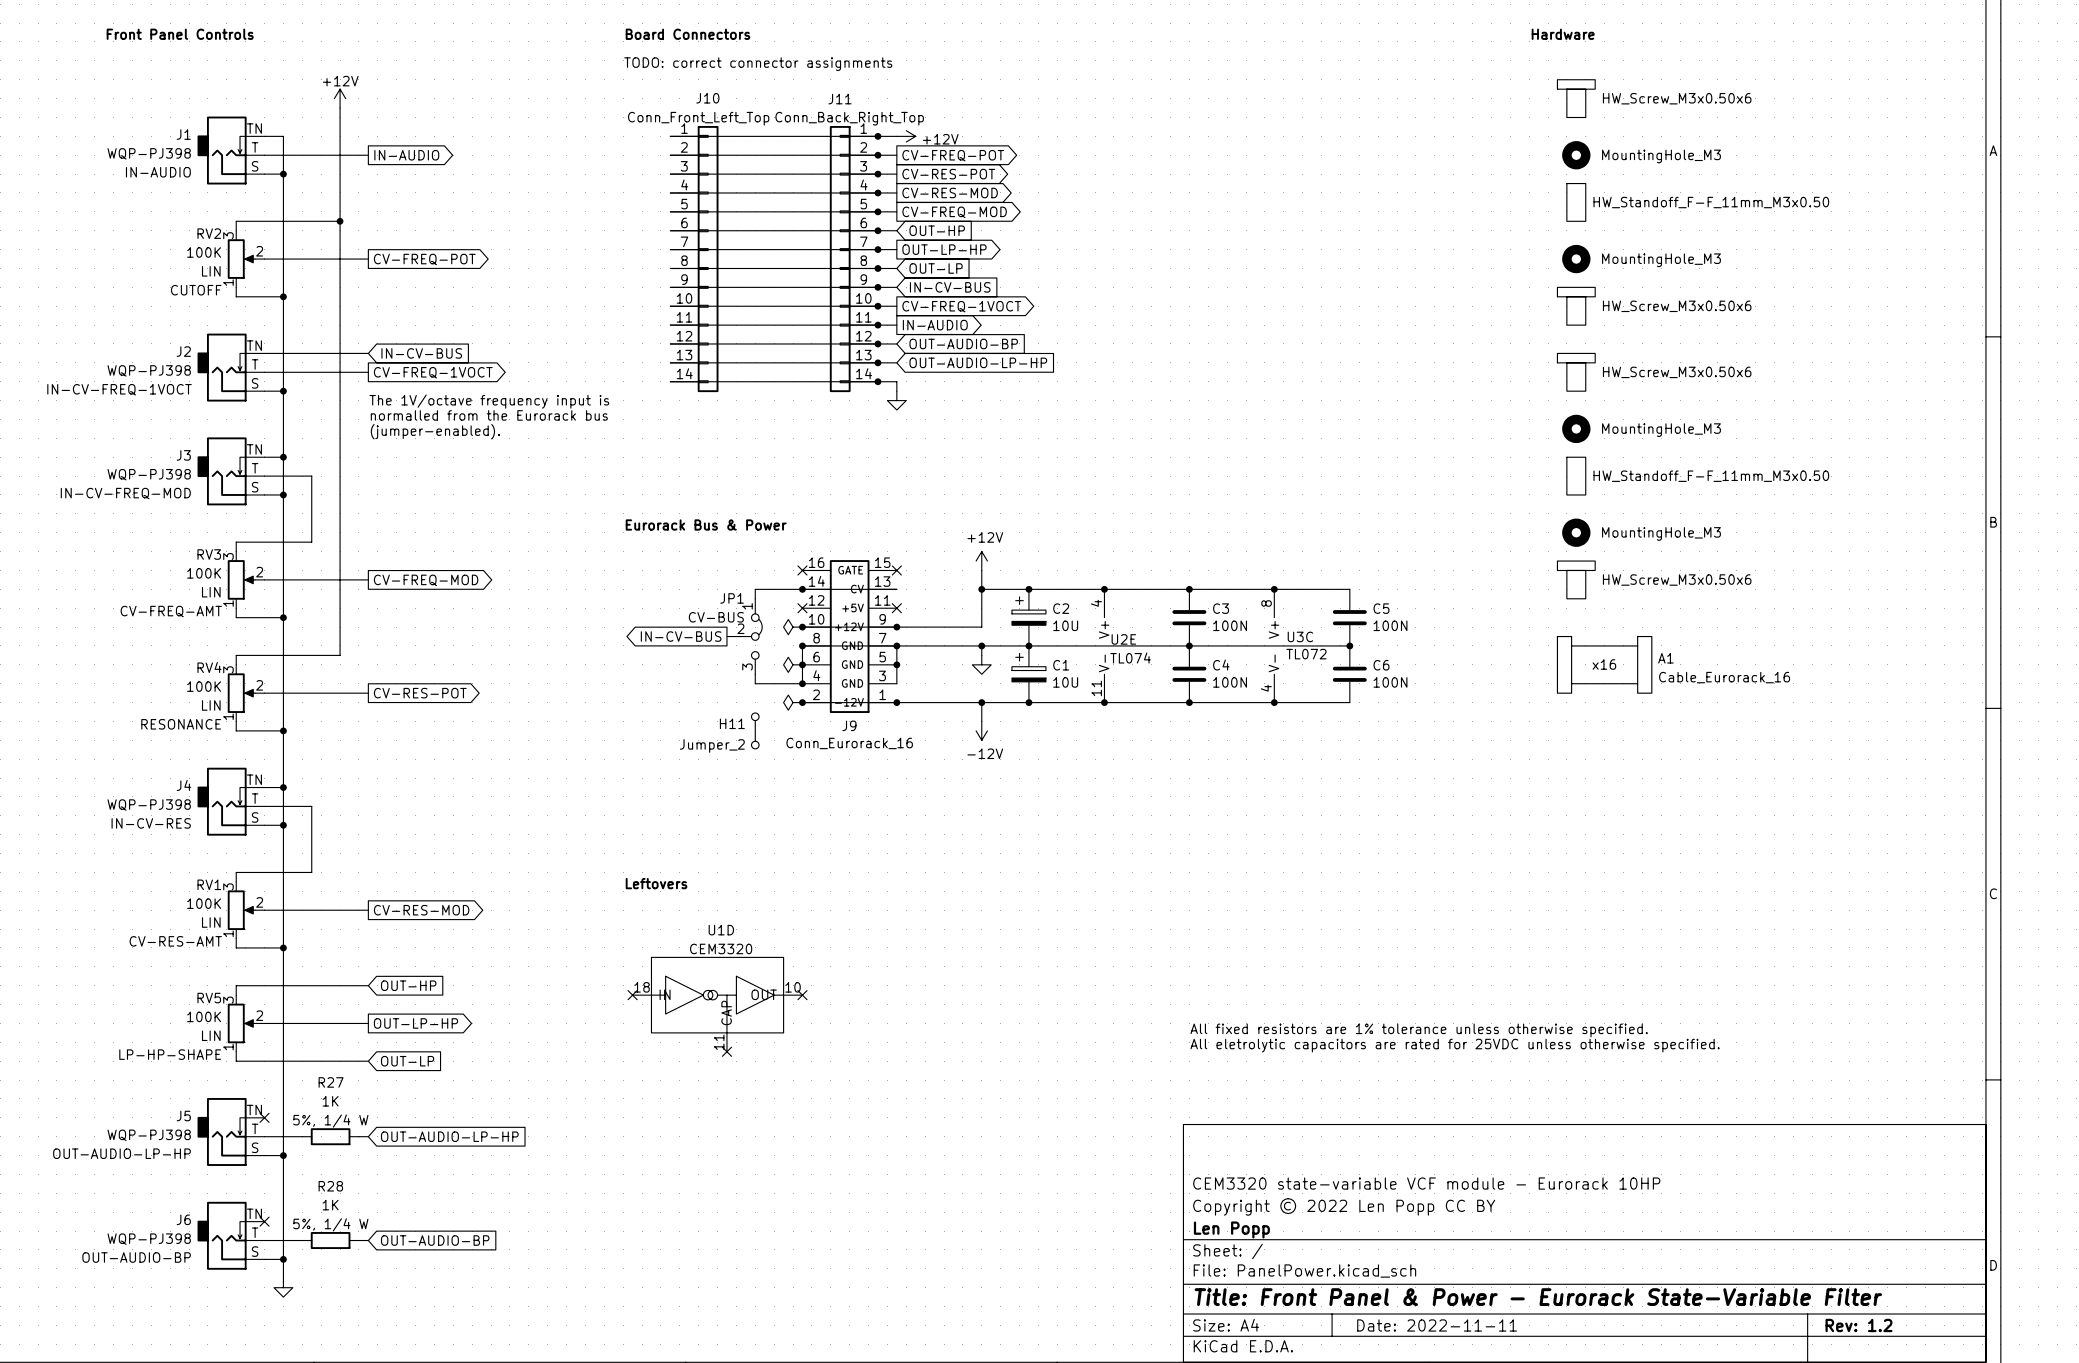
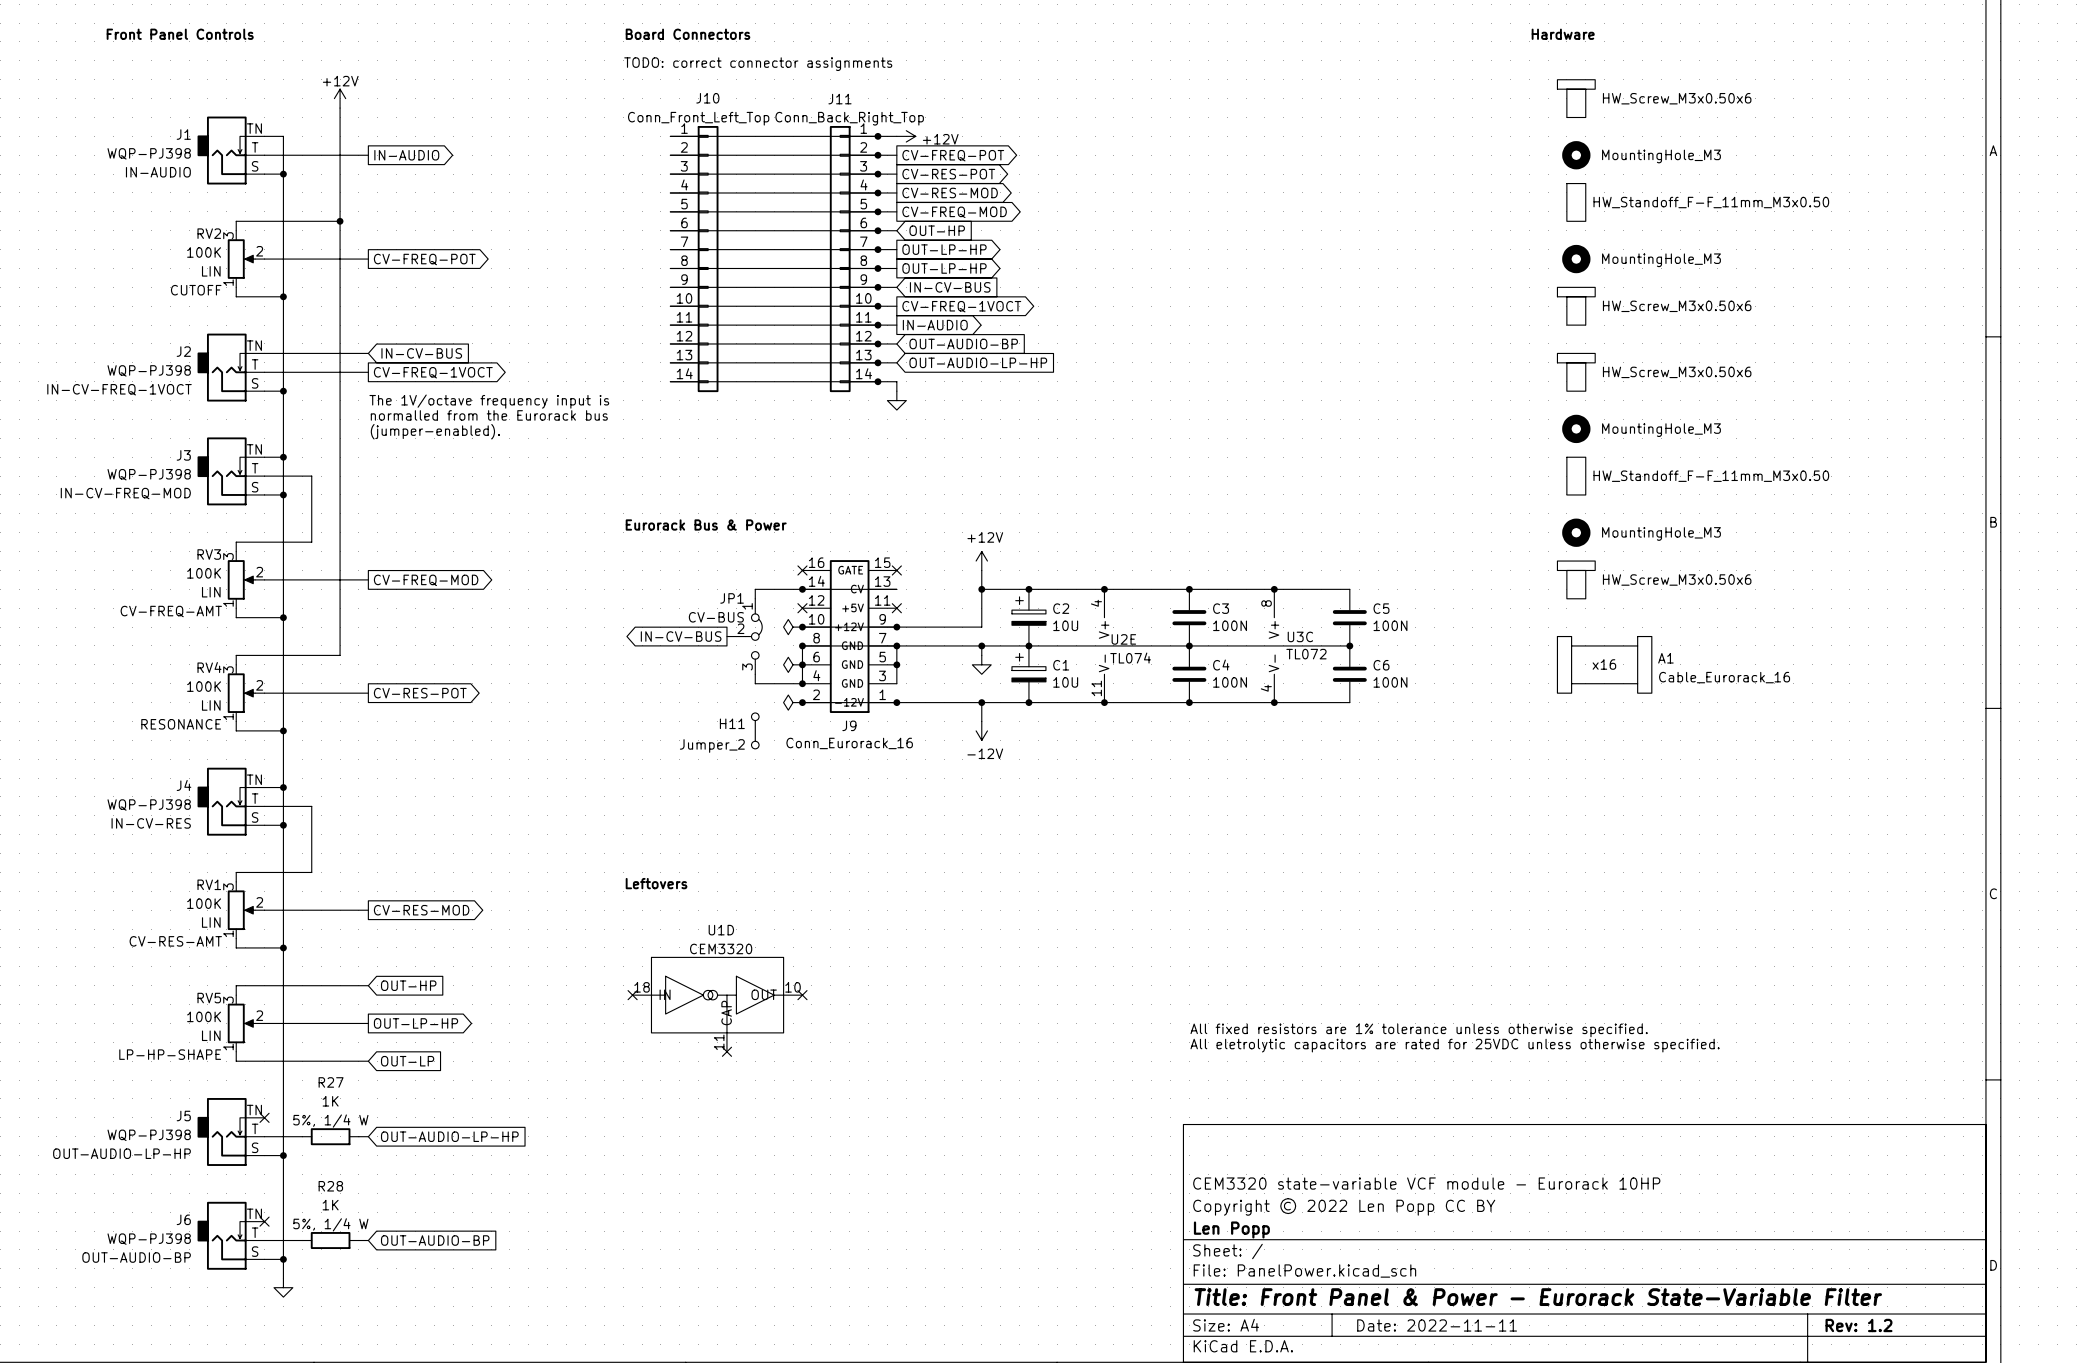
global label shape: input (936, 268) -> output (944, 268)
global label: OUT-LP (936, 268) -> OUT-LP-HP (944, 268)

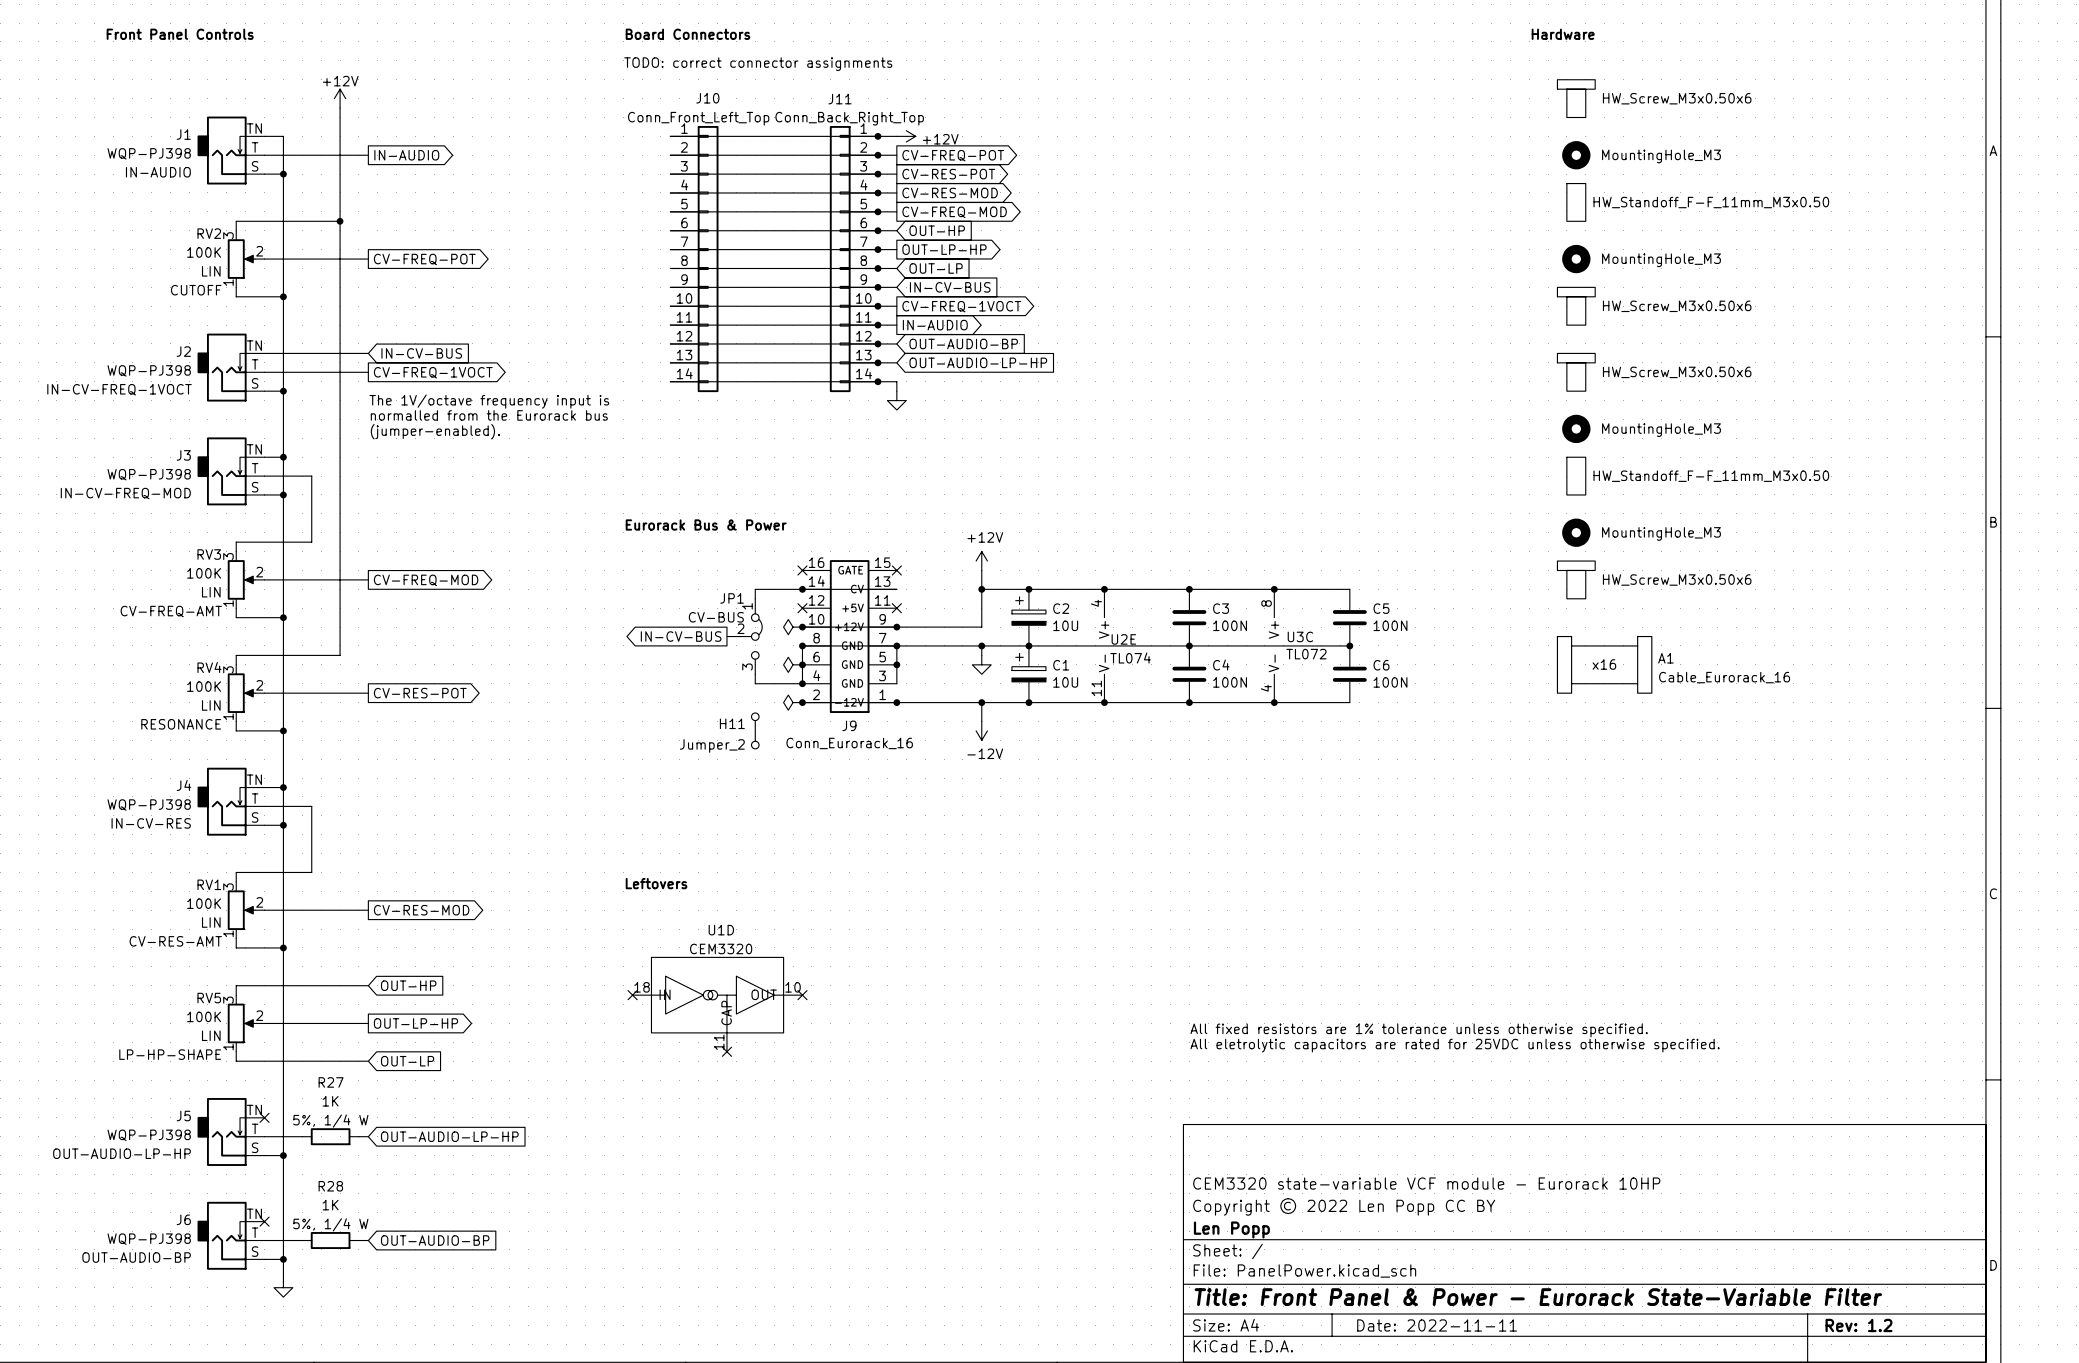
global label shape: output (944, 268) -> input (936, 268)
global label: OUT-LP-HP (944, 268) -> OUT-LP (936, 268)

